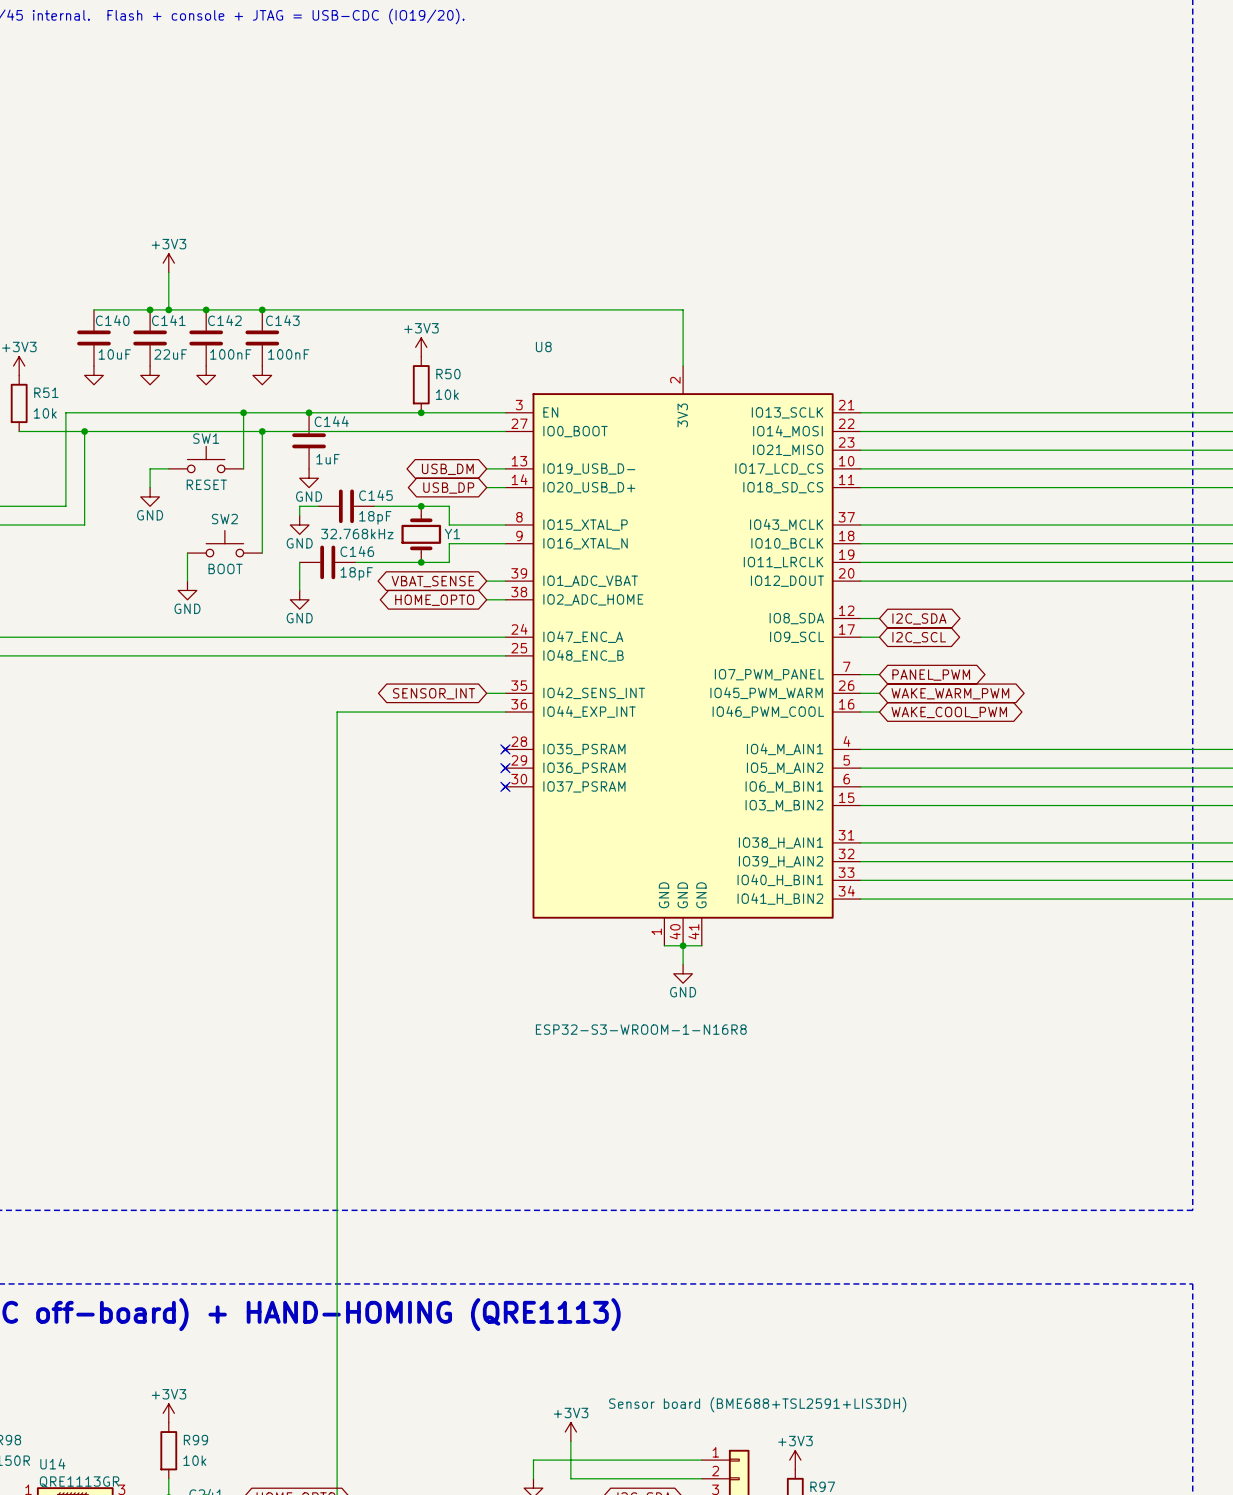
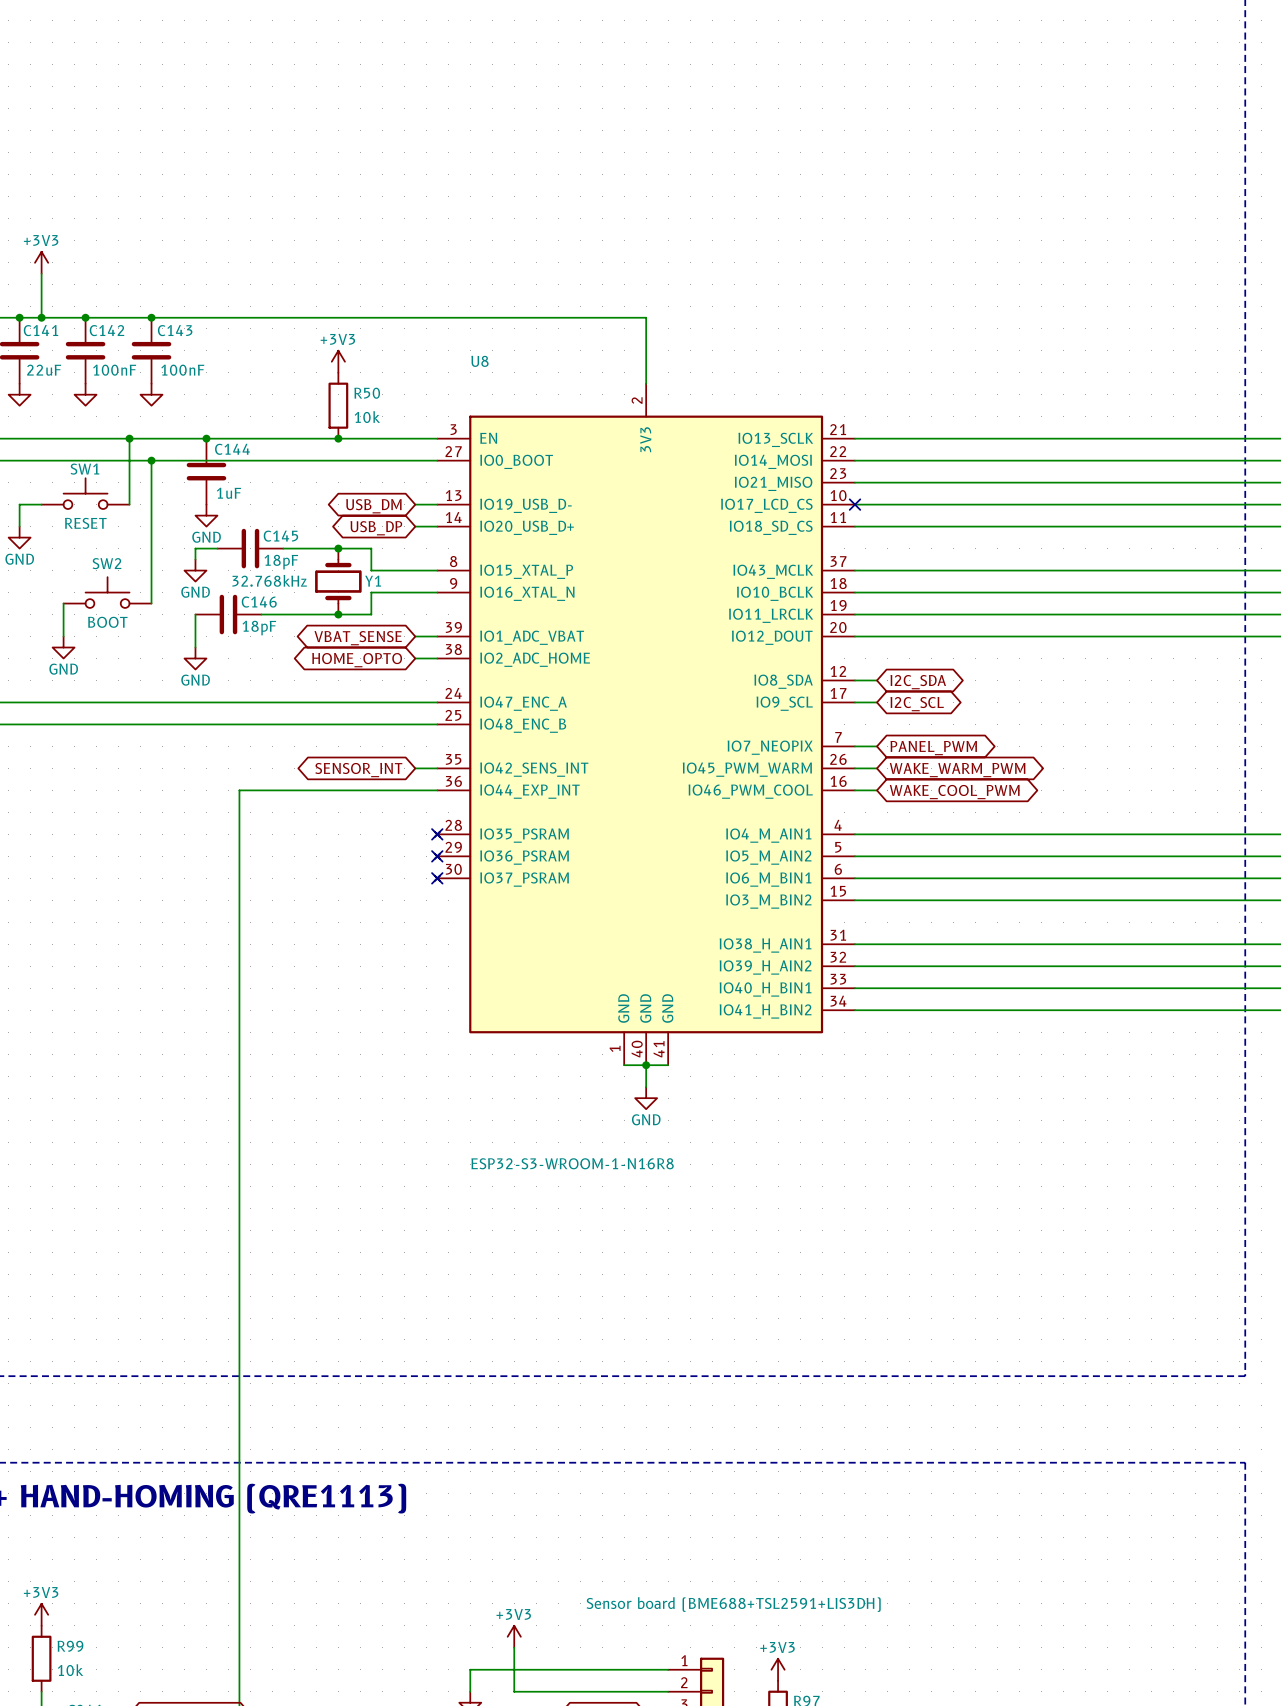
no-connect mark: none -> (854, 504)
U8 pin name: IO7_PWM_PANEL (769, 674) -> IO7_NEOPIX (770, 747)

